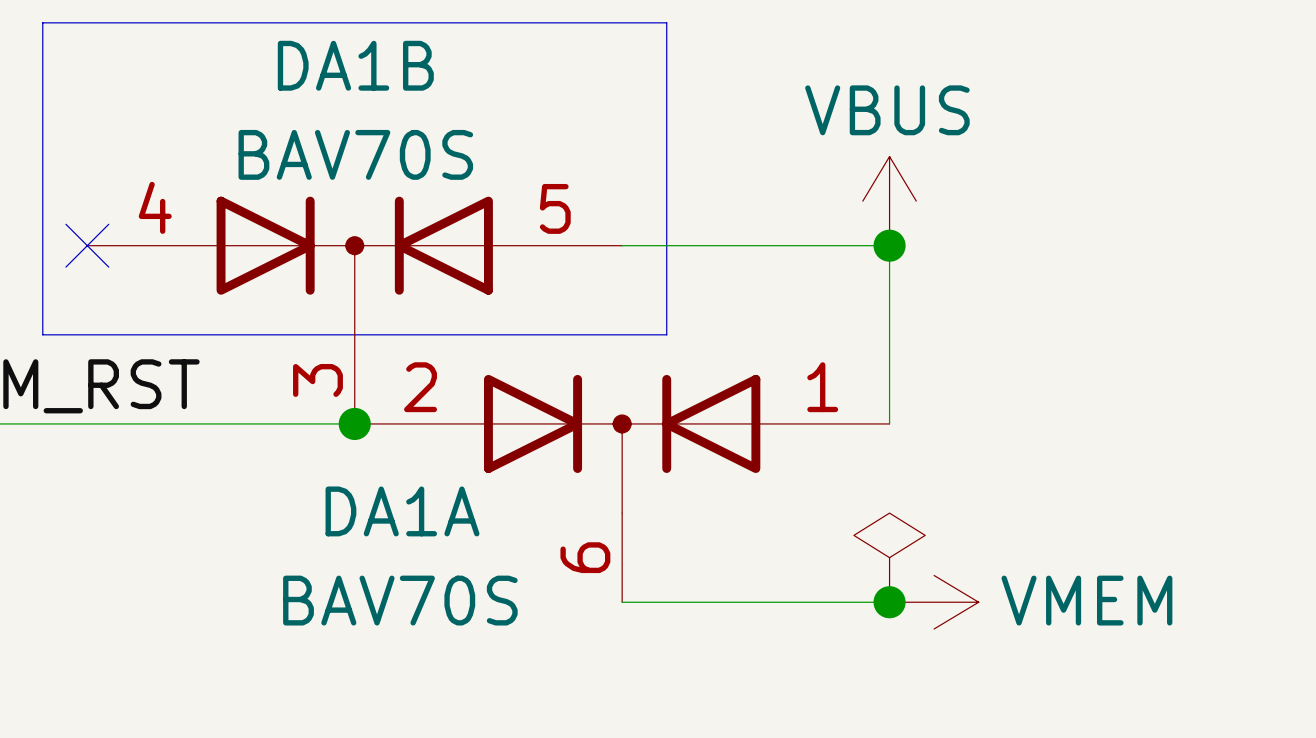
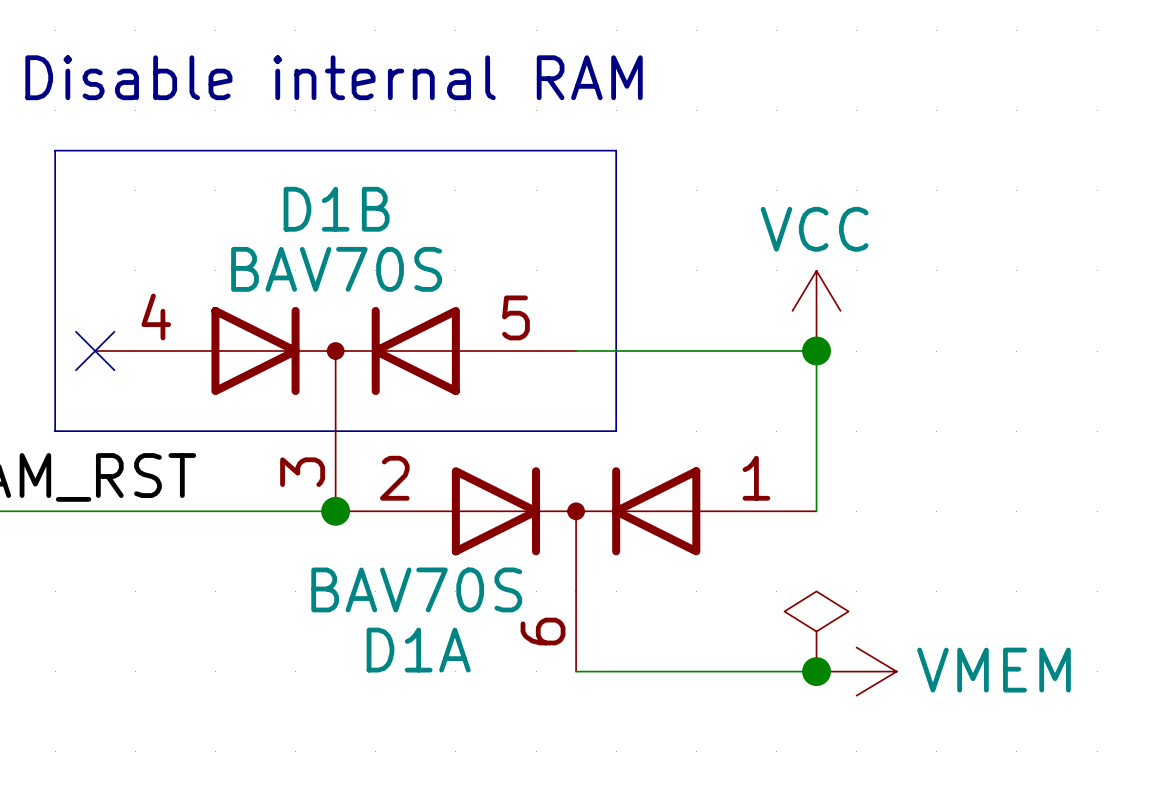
DA1B name: DA1B (355, 65) -> D1B (336, 209)
power symbol: VBUS (889, 201) -> VCC (816, 310)
DA1A name: DA1A (402, 511) -> D1A (418, 650)
DA1A value position: BAV70S (400, 600) -> BAV70S (416, 589)

